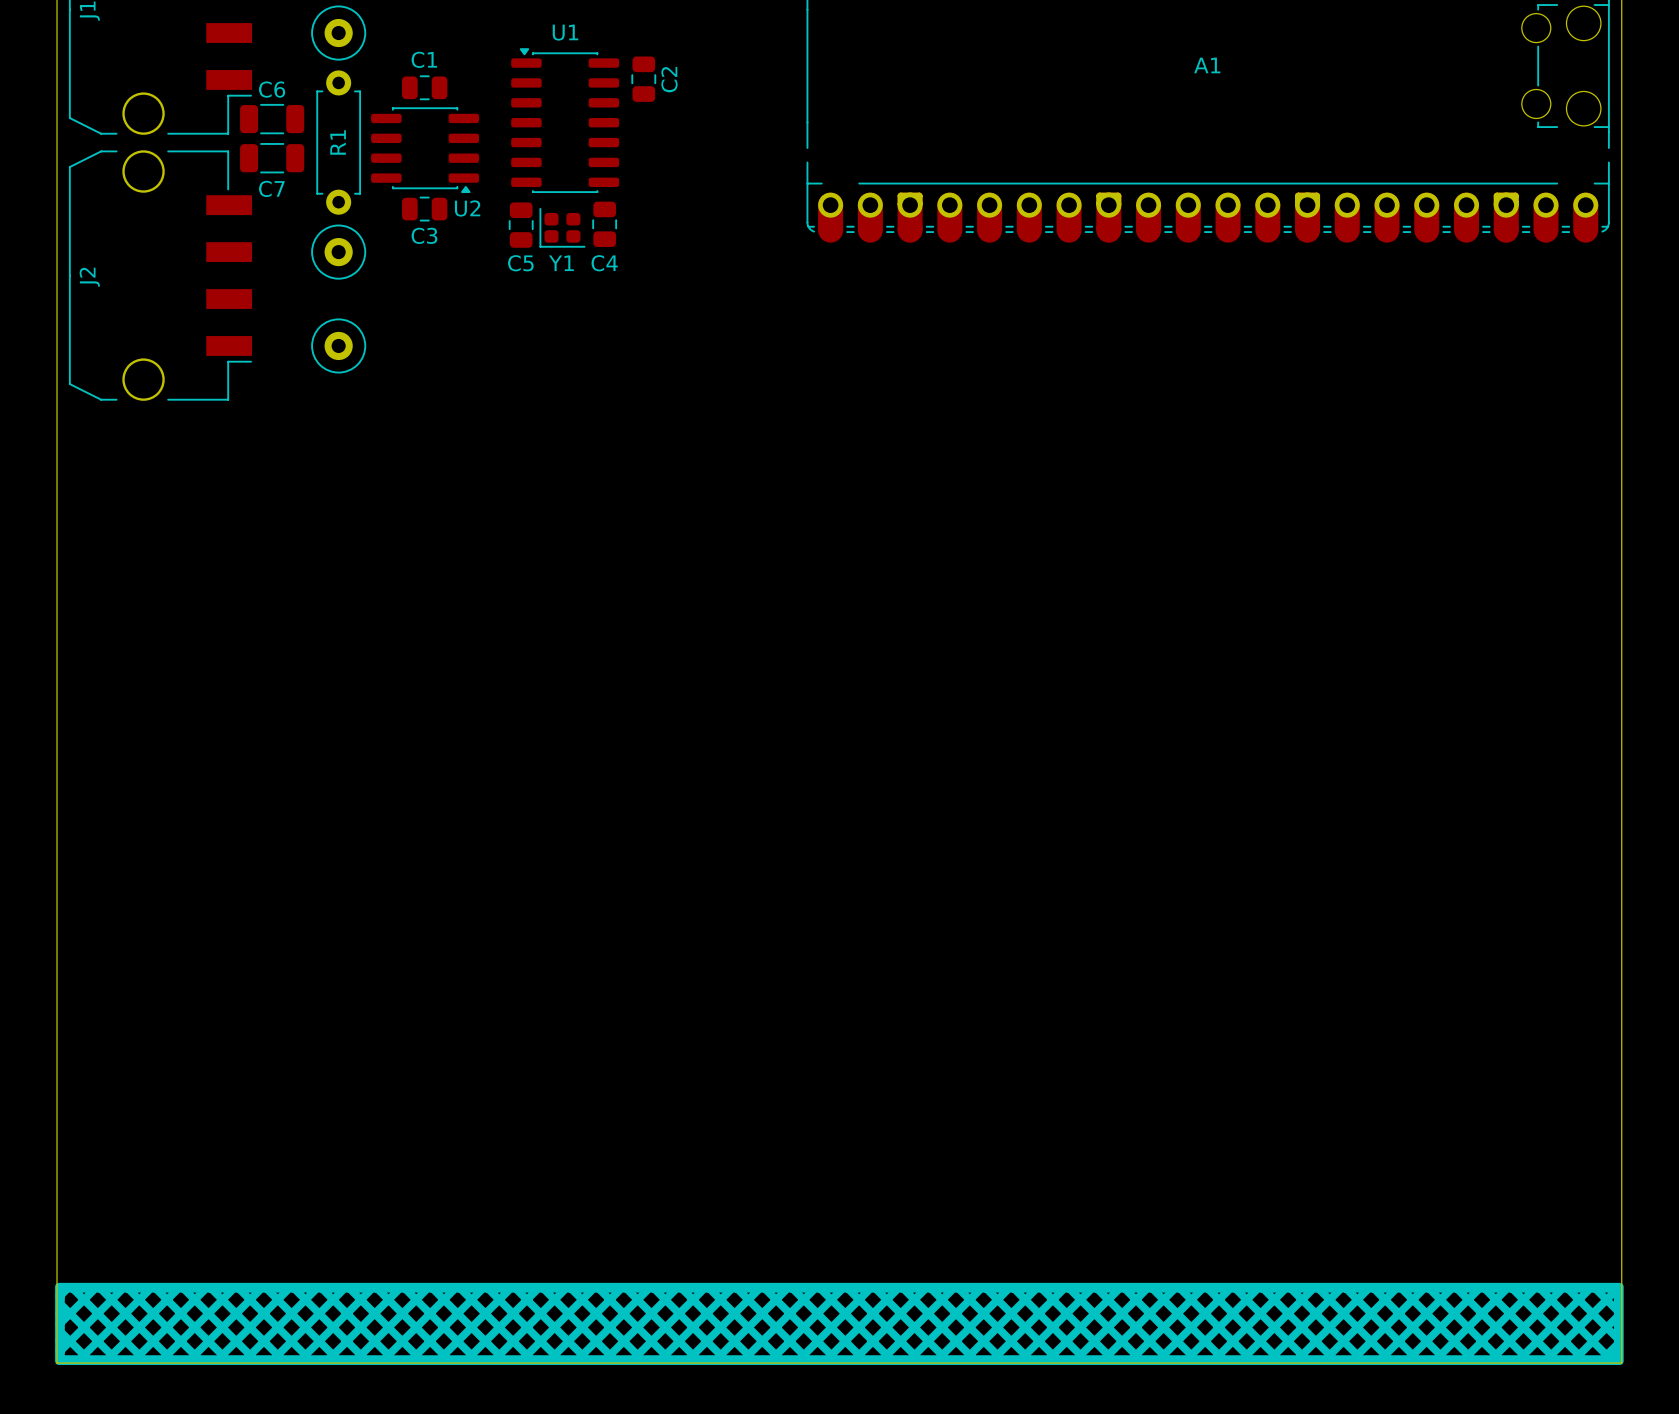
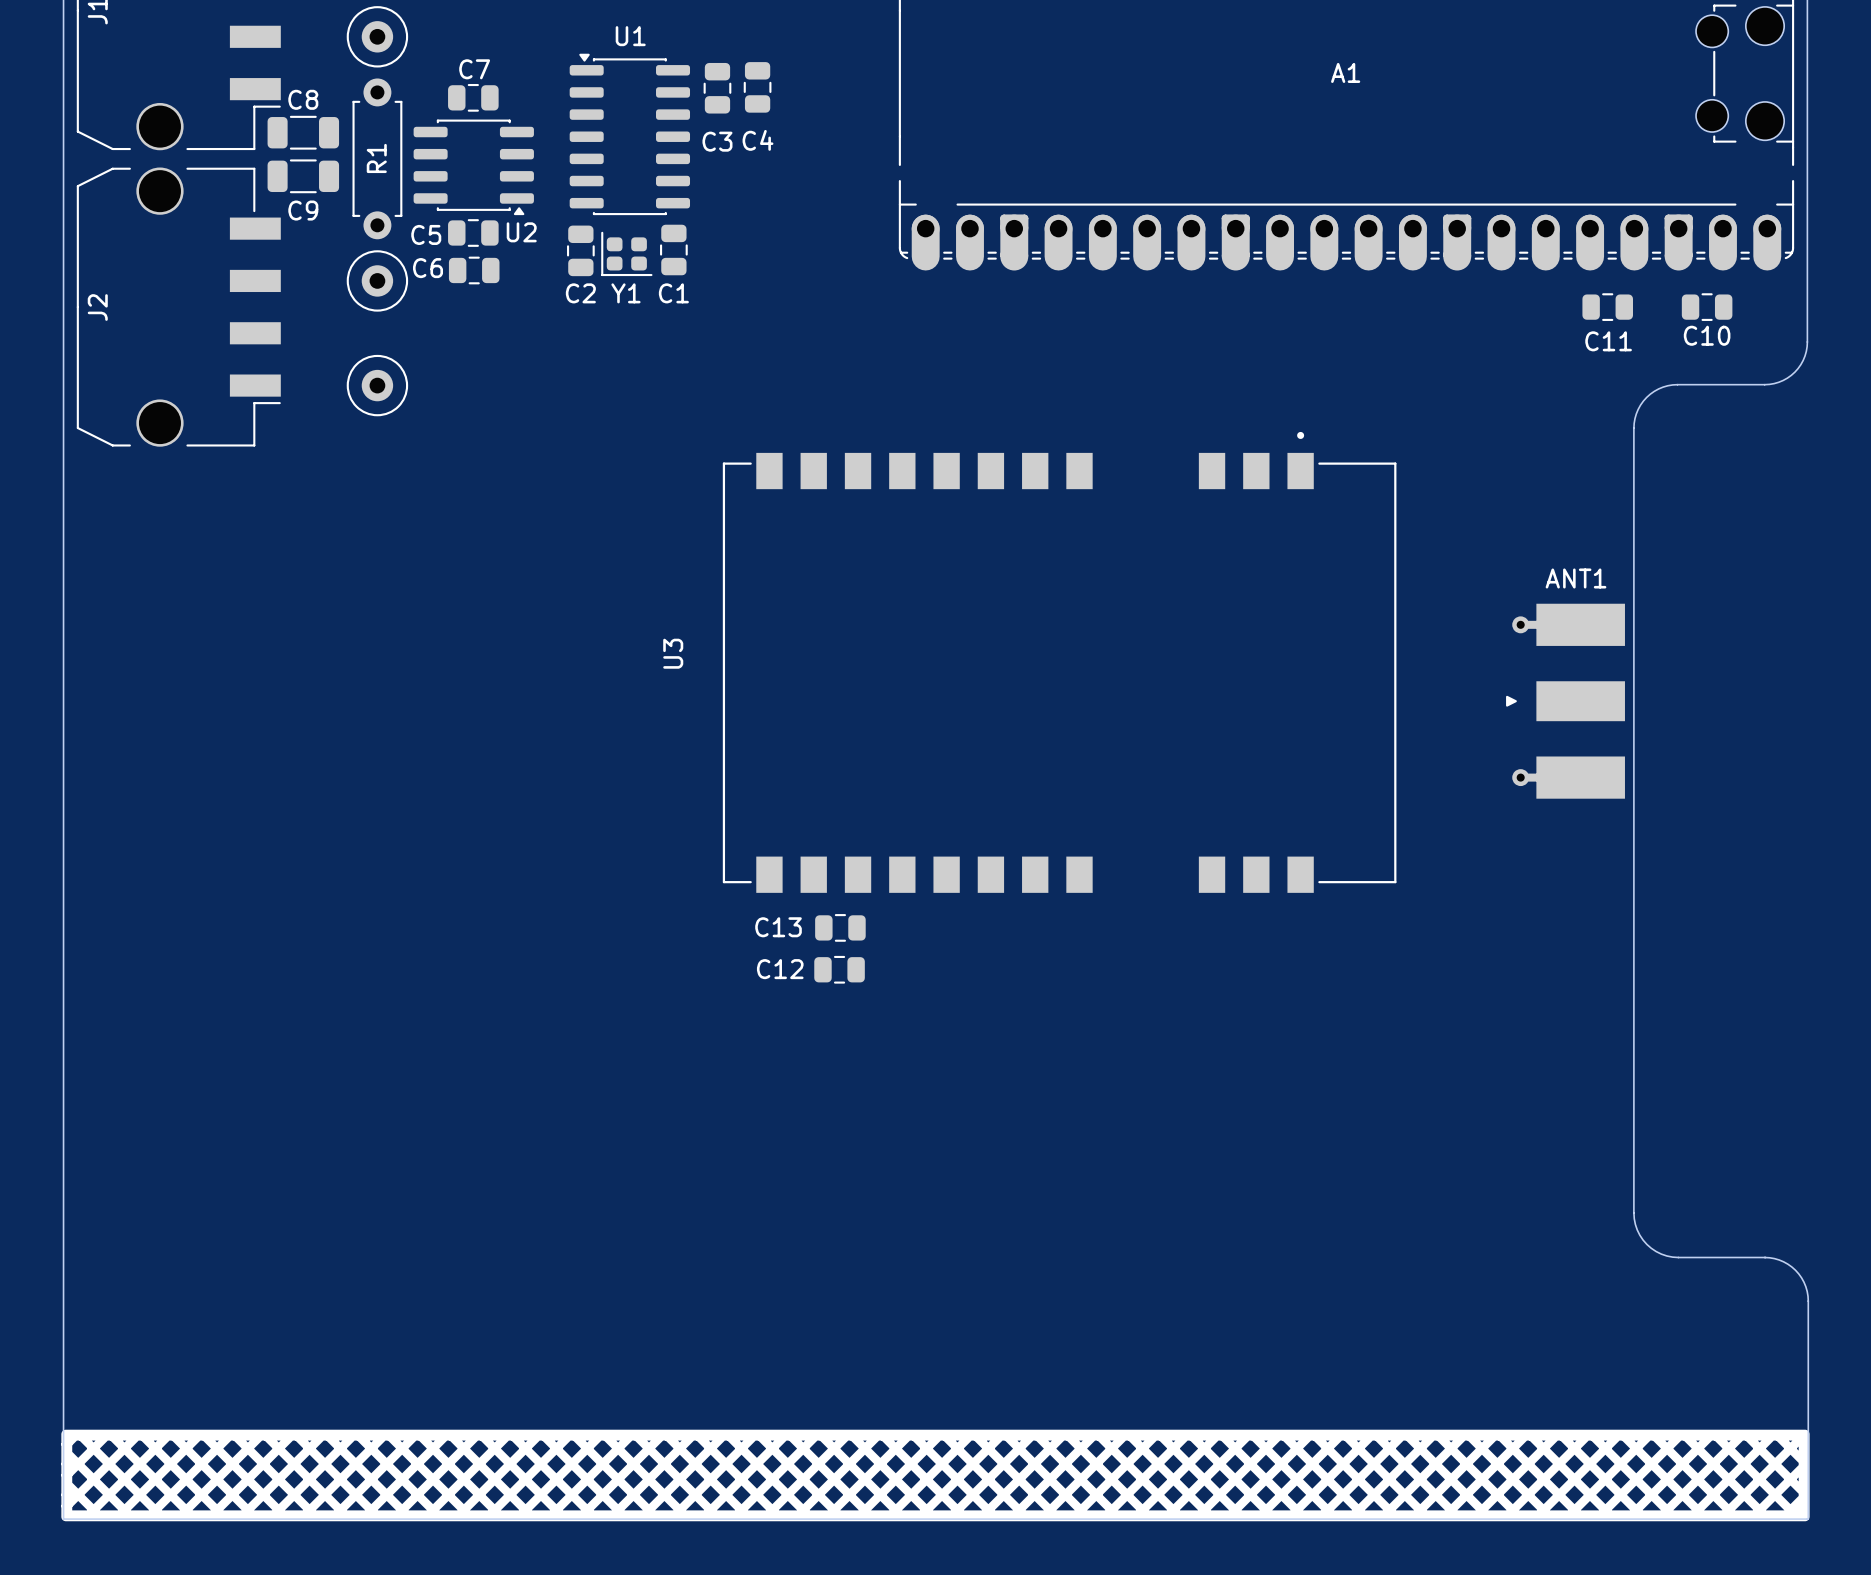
C1 name: C1 (424, 59) -> C7 (474, 69)
C4: none -> (757, 87)
C2 name: C2 (669, 79) -> C3 (717, 141)
C6 name: C6 (272, 89) -> C8 (303, 99)
C7 name: C7 (271, 188) -> C9 (303, 210)
C3 name: C3 (424, 235) -> C5 (426, 234)
C6: none -> (474, 270)
C5 name: C5 (520, 263) -> C2 (580, 293)
C4 name: C4 (604, 263) -> C1 (673, 293)
C11: none -> (1607, 307)
C10: none -> (1707, 307)
board edge: (1621, 306) (1621, 1363) -> (1807, 341) (1804, 356) (1798, 368) (1791, 375) (1778, 382) (1764, 384) (1677, 384) (1658, 388) (1646, 397) (1640, 405) (1636, 413) (1633, 428) (1634, 1218) (1639, 1235) (1646, 1244) (1656, 1251) (1666, 1255) (1765, 1257)
U3: none -> (1059, 662)
ANT1: none -> (1565, 701)
C13: none -> (840, 927)
C12: none -> (839, 969)
board edge: none -> (1764, 1257) (1779, 1259) (1791, 1267) (1803, 1282) (1808, 1296) (1807, 1519)

